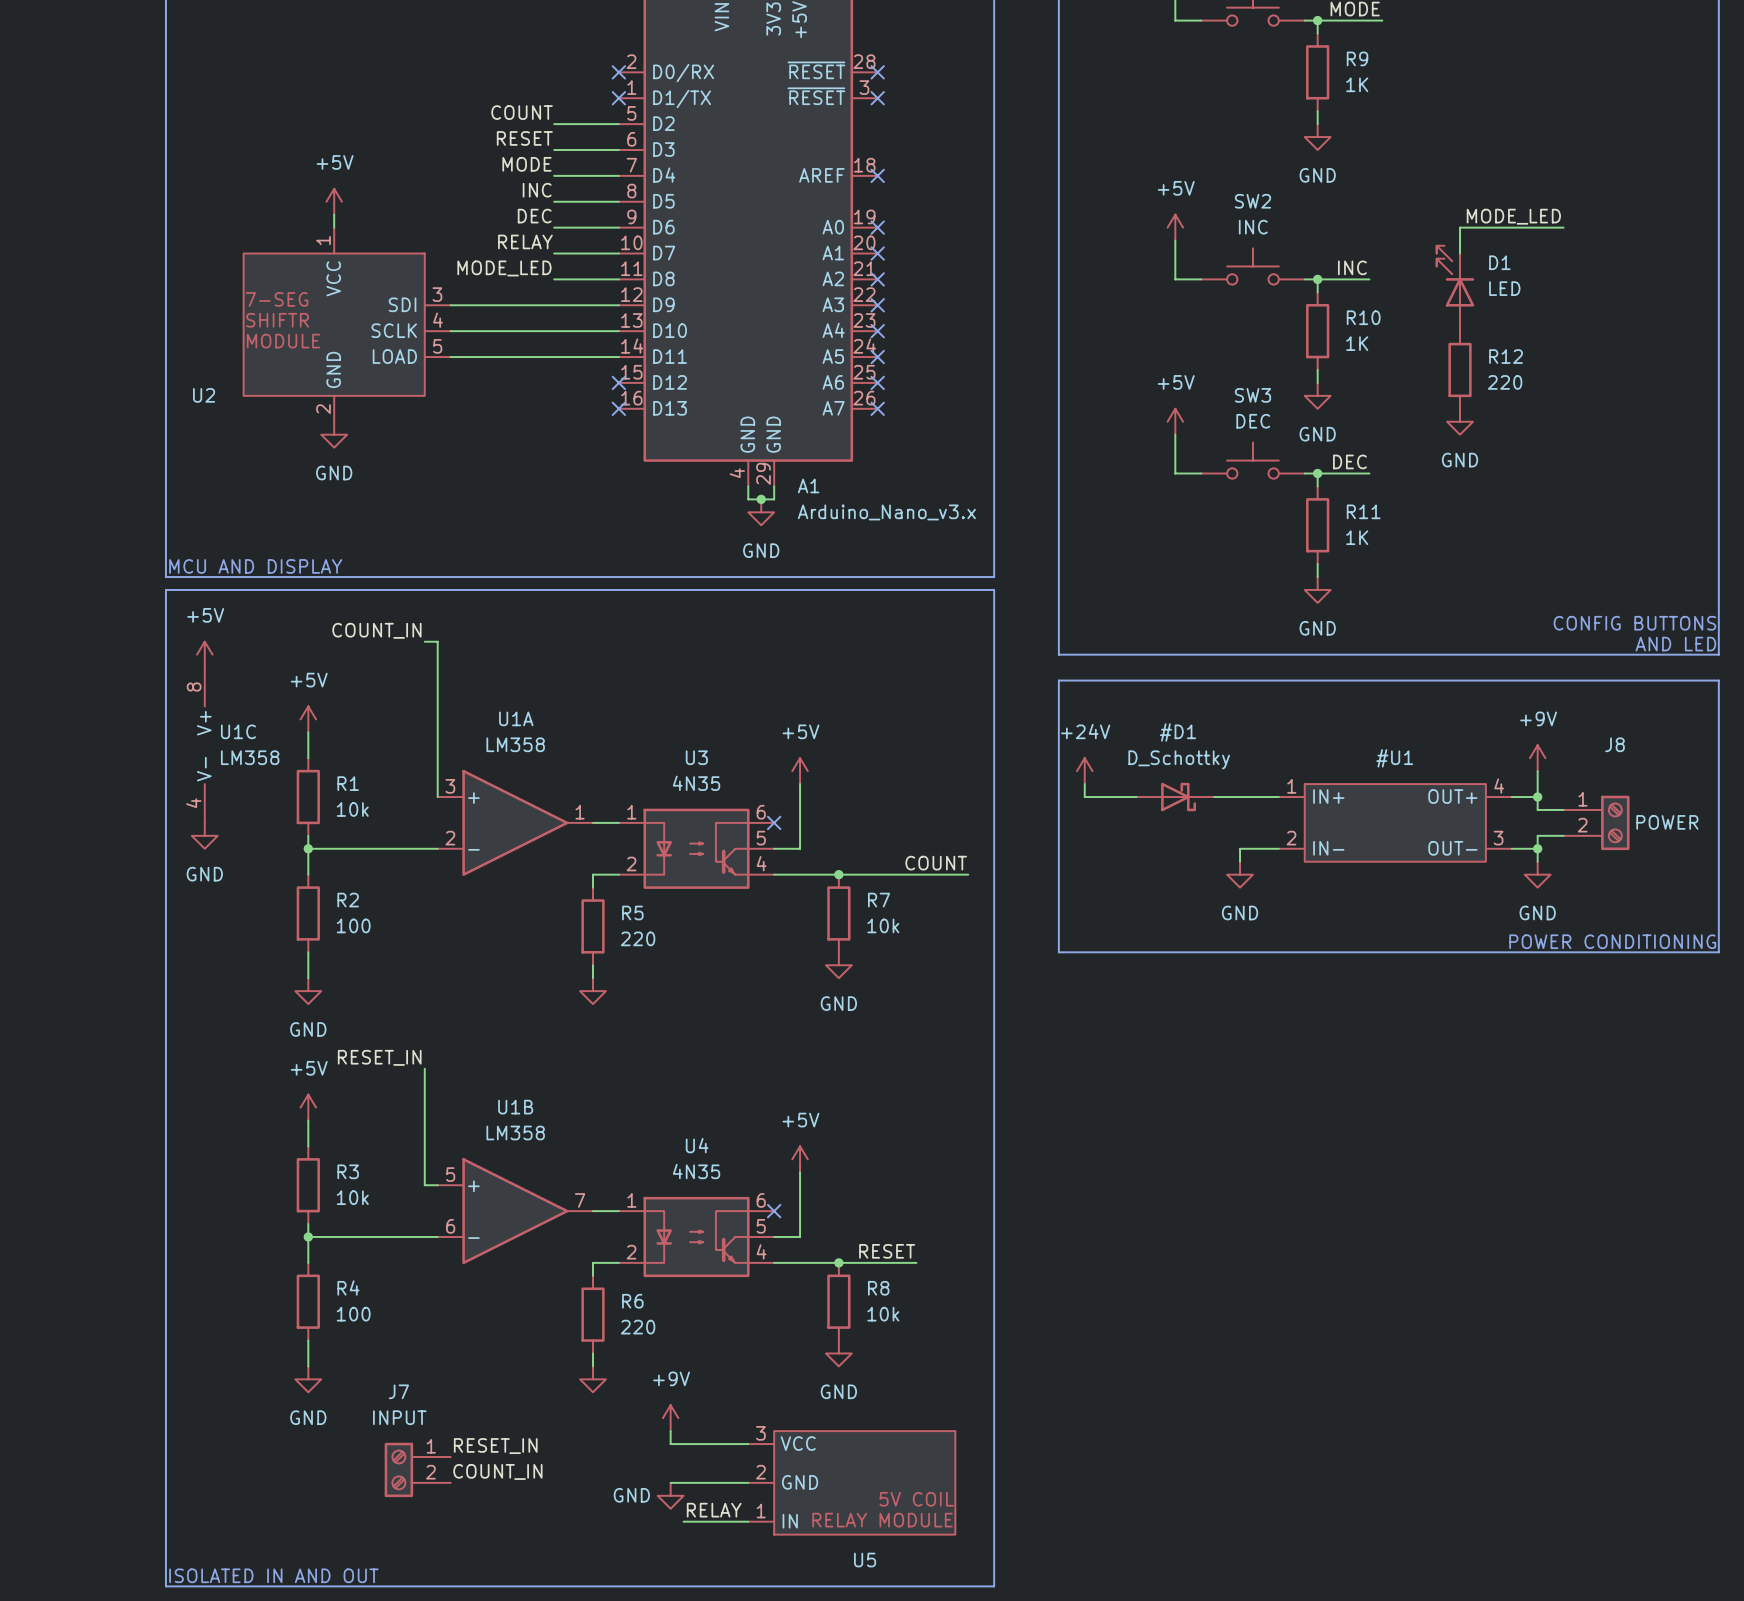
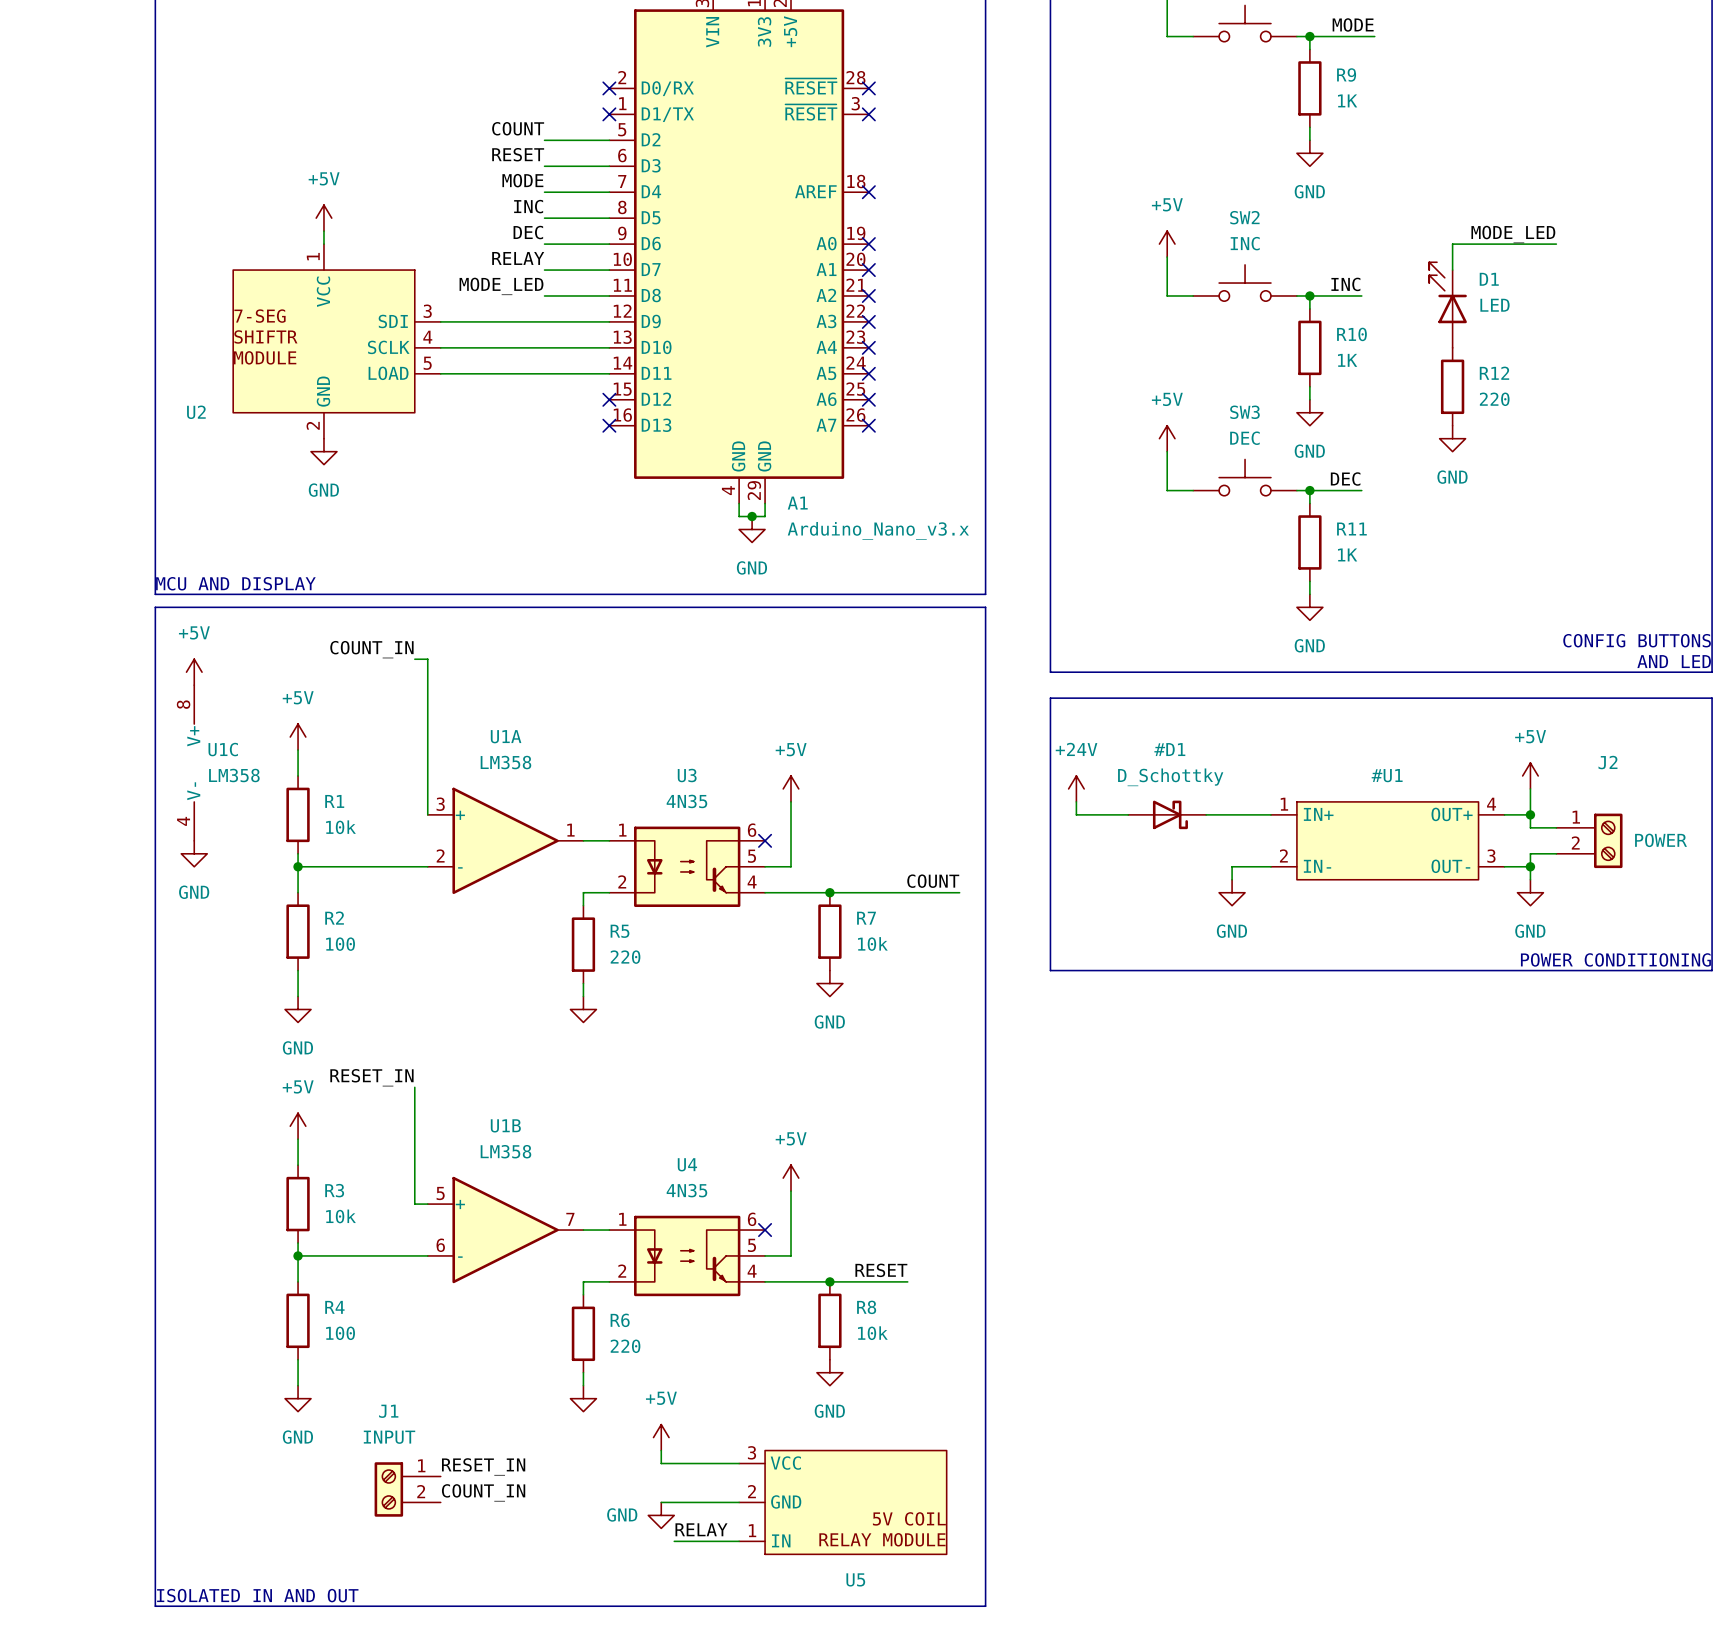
J8 name: J8 (1615, 744) -> J2 (1607, 762)
power symbol: +9V (1537, 758) -> +5V (1530, 775)
J7 name: J7 (398, 1391) -> J1 (388, 1411)
power symbol: +9V (670, 1418) -> +5V (661, 1437)

